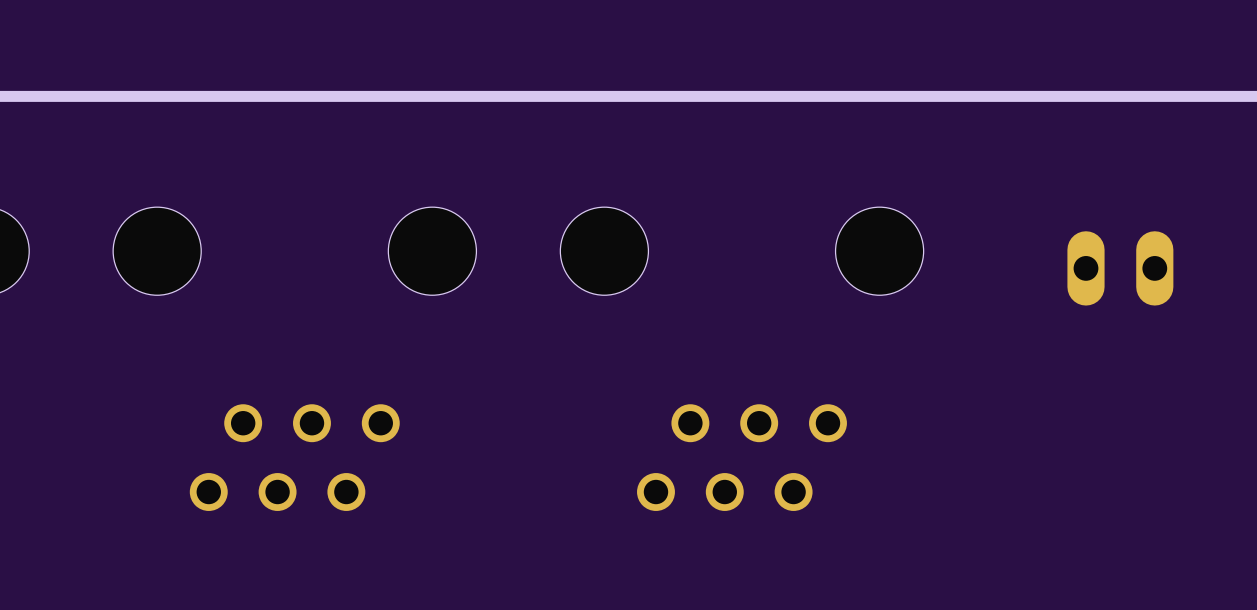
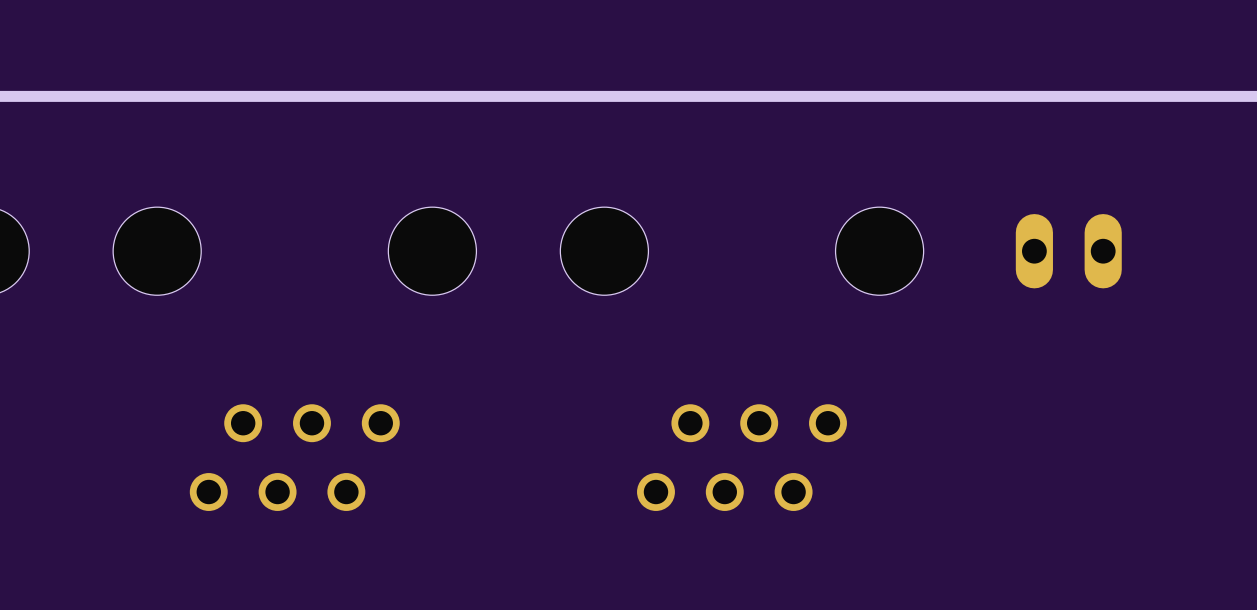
part position: (1120, 268) -> (1068, 251)

